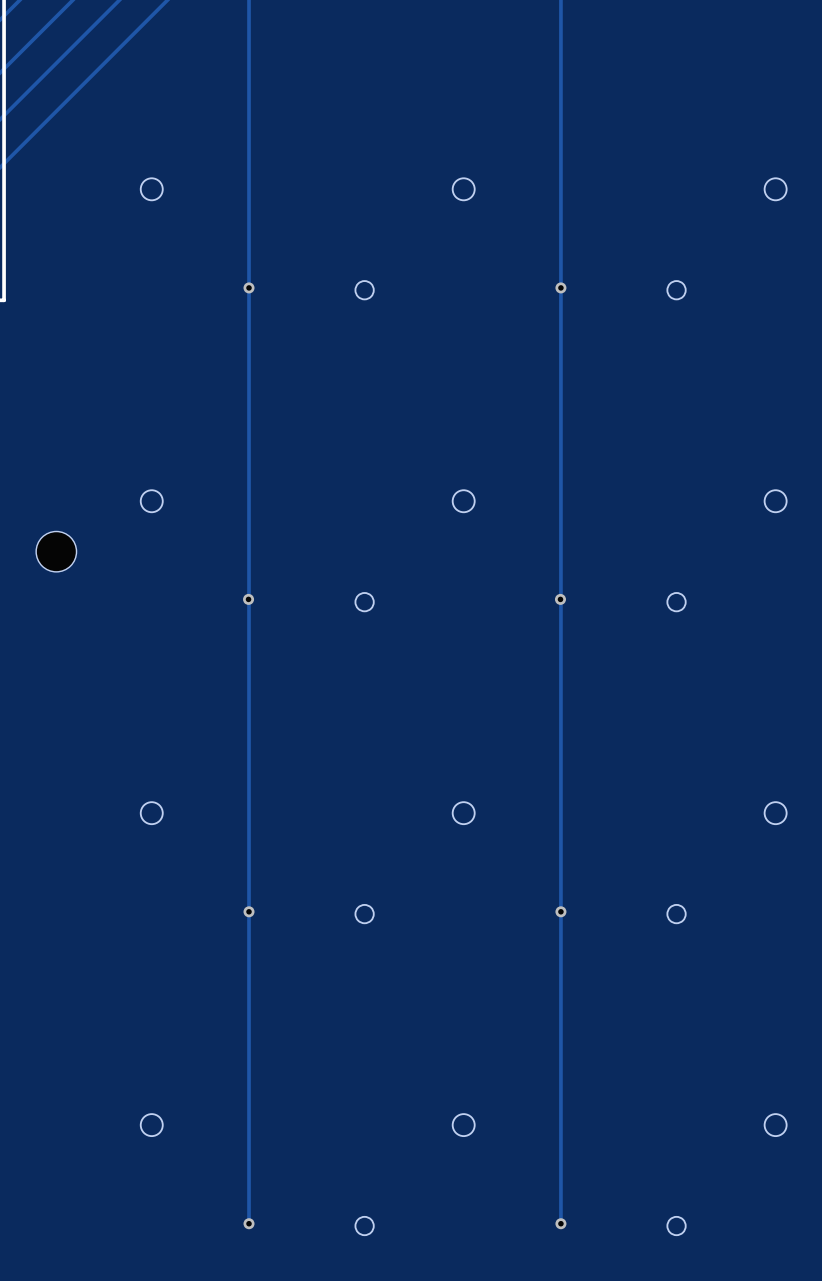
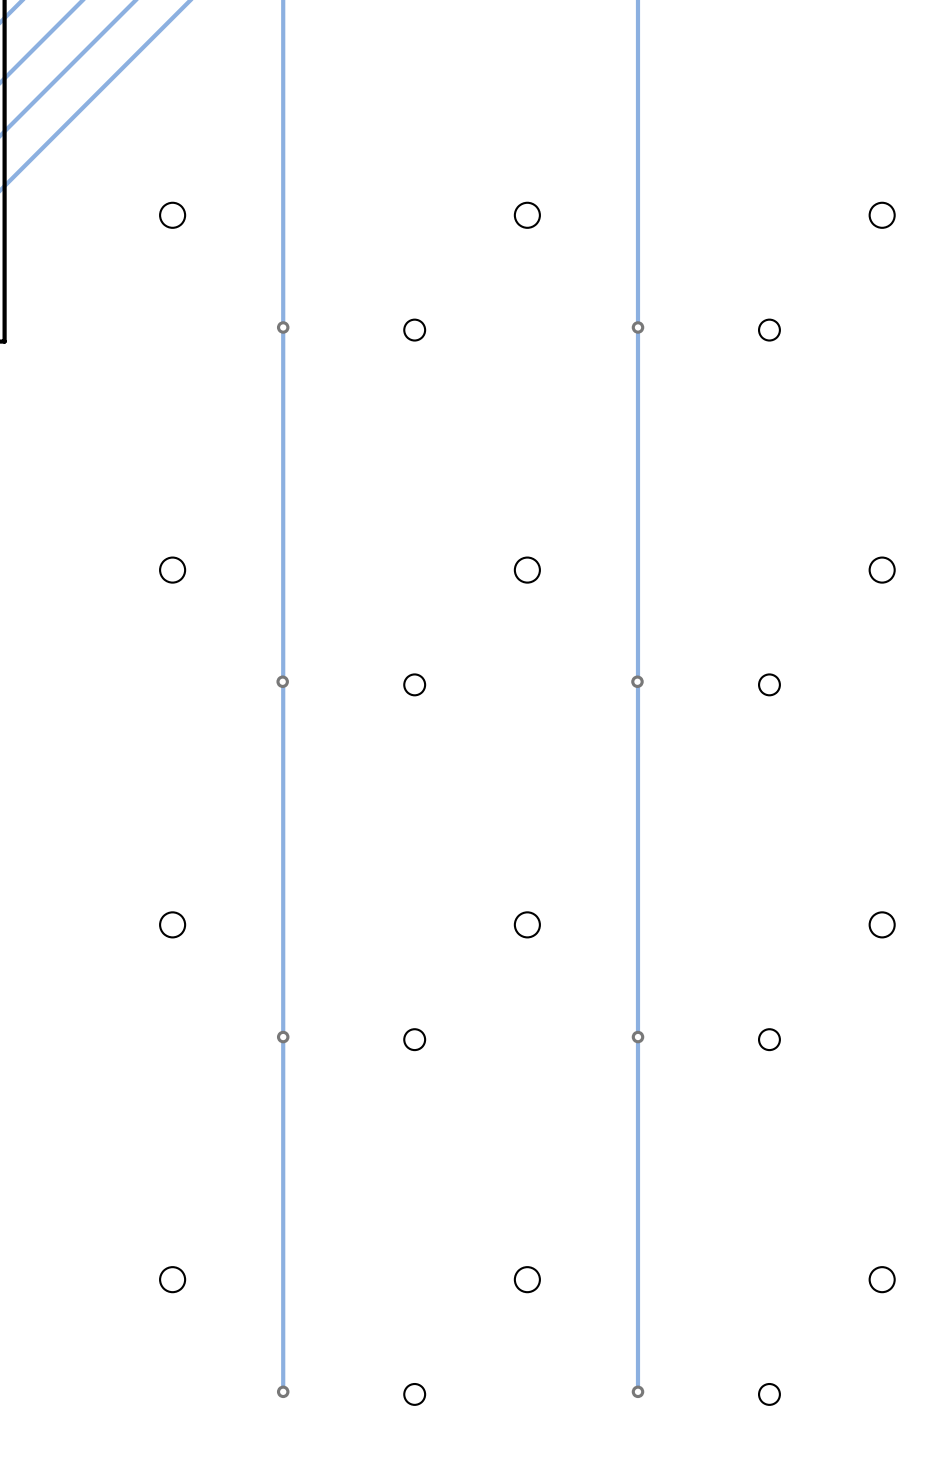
part: (56, 551) -> none

